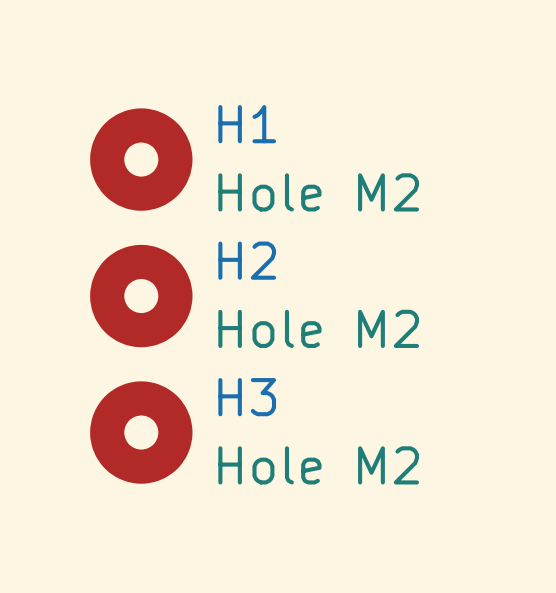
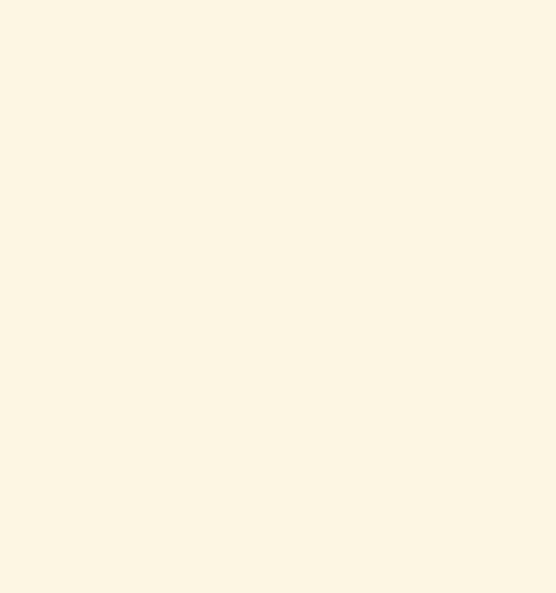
H1: Hole M2 (141, 159) -> none
H2: Hole M2 (141, 296) -> none
H3: Hole M2 (141, 432) -> none

